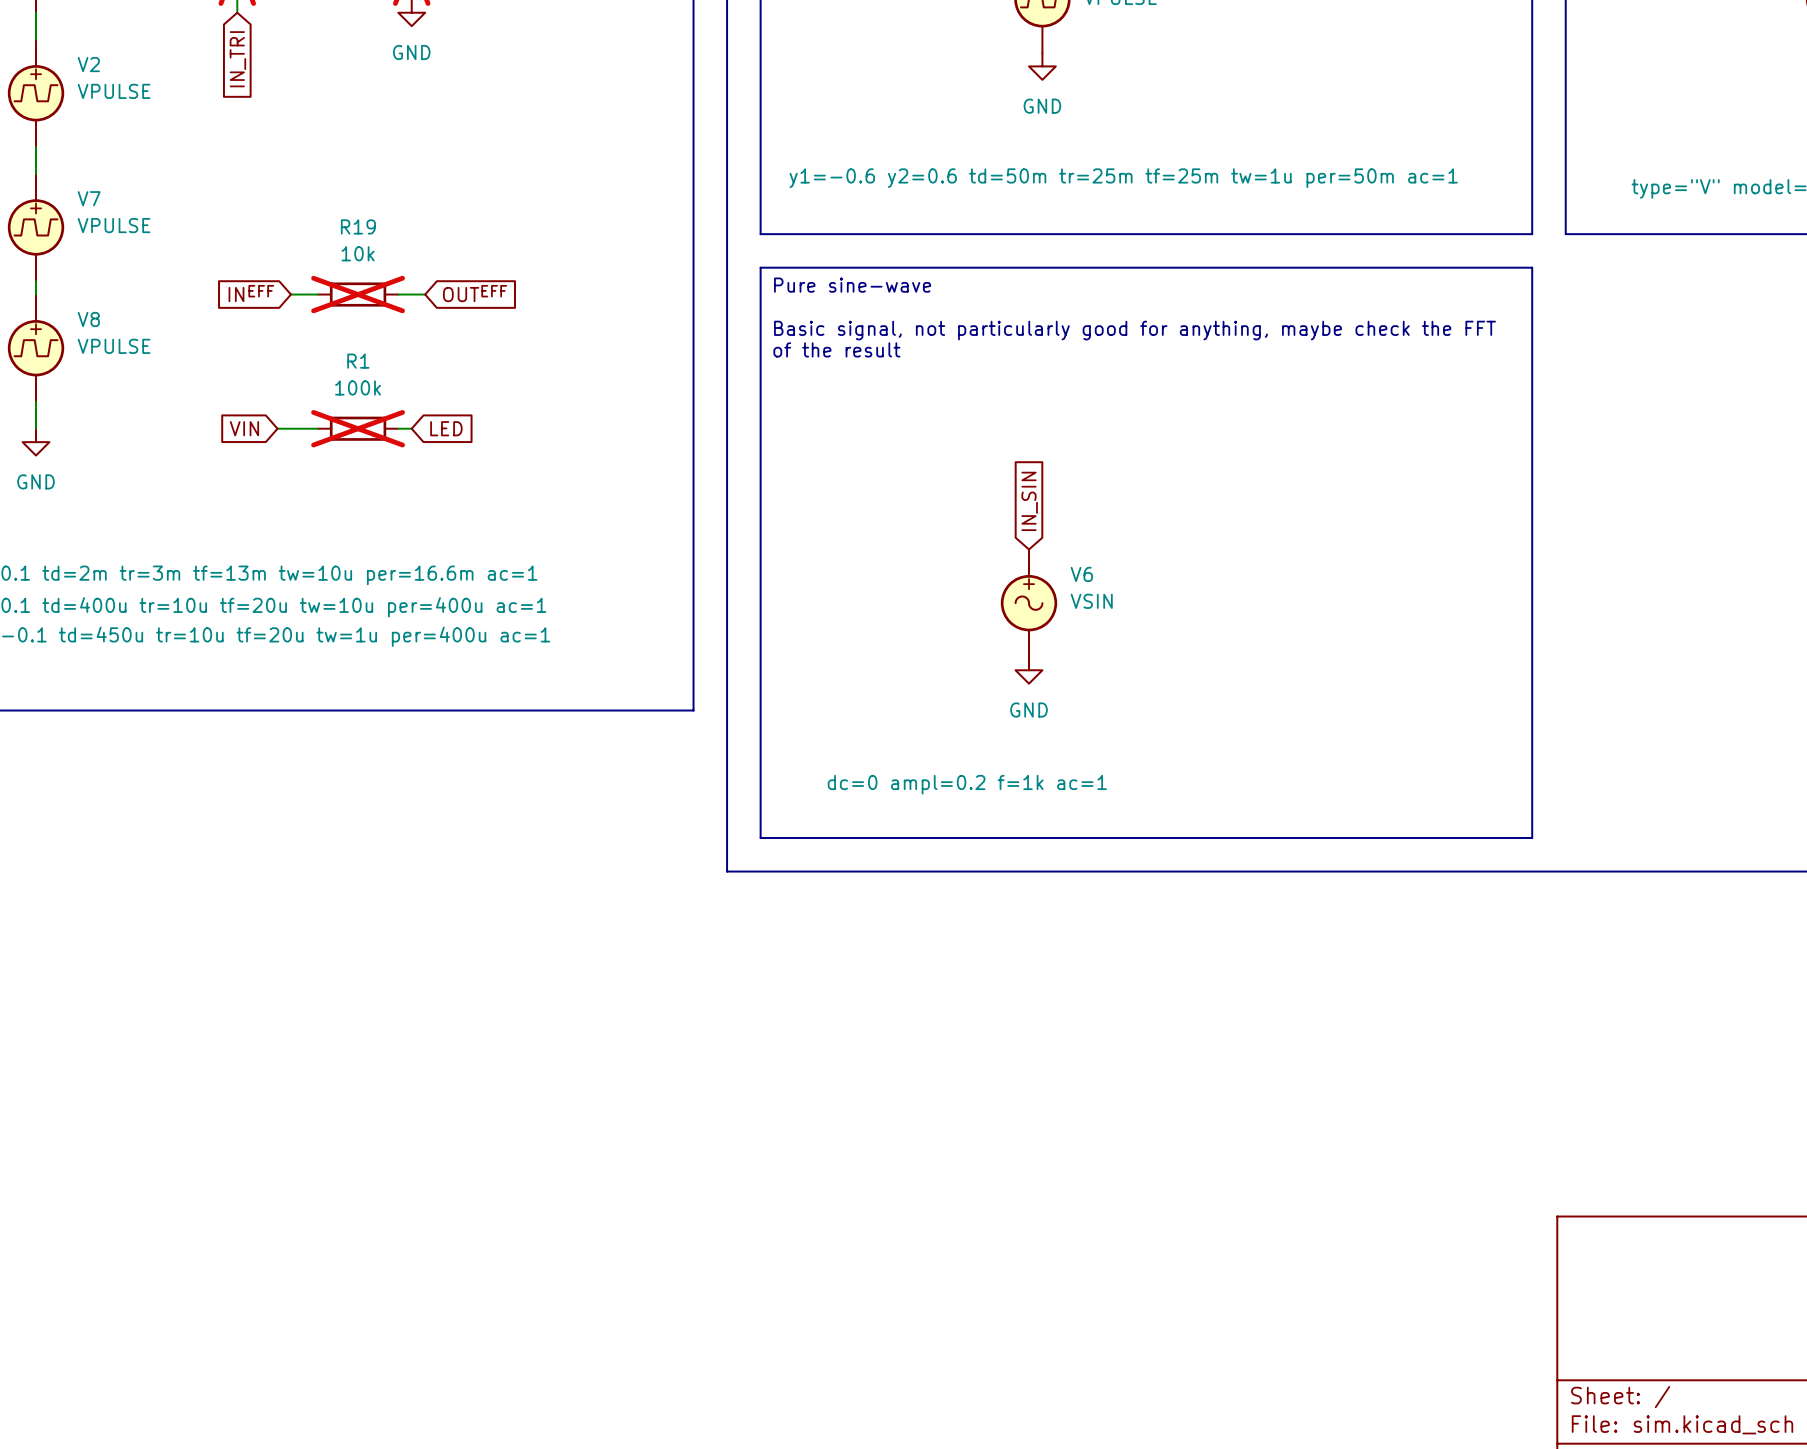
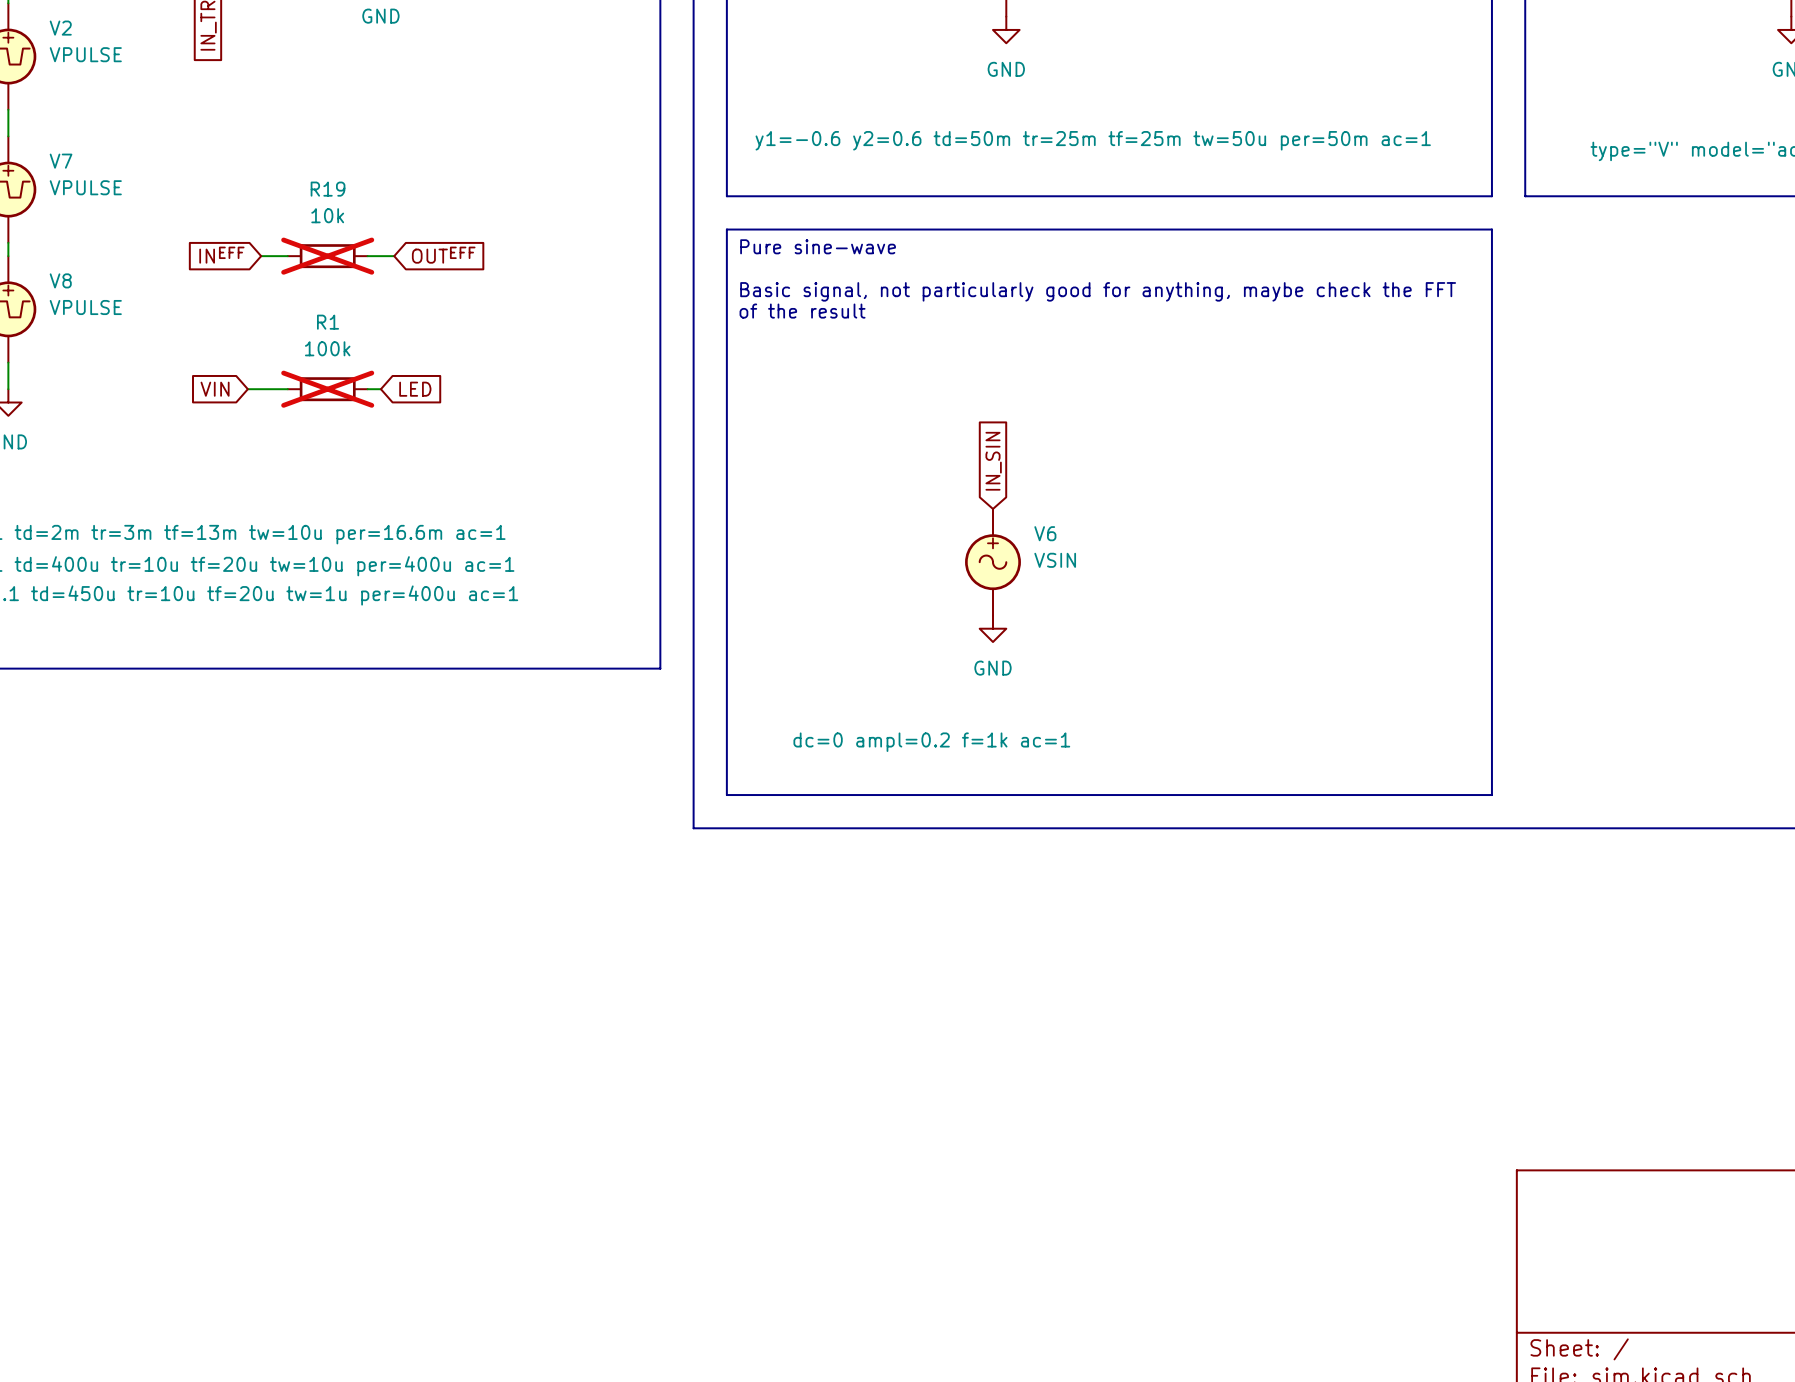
part text: y1=-0.6 y2=0.6 td=50m tr=25m tf=25m tw=1u per=50m ac=1 (1123, 178) -> y1=-0.6 y2=0.6 td=50m tr=25m tf=25m tw=50u per=50m ac=1 (1093, 140)

